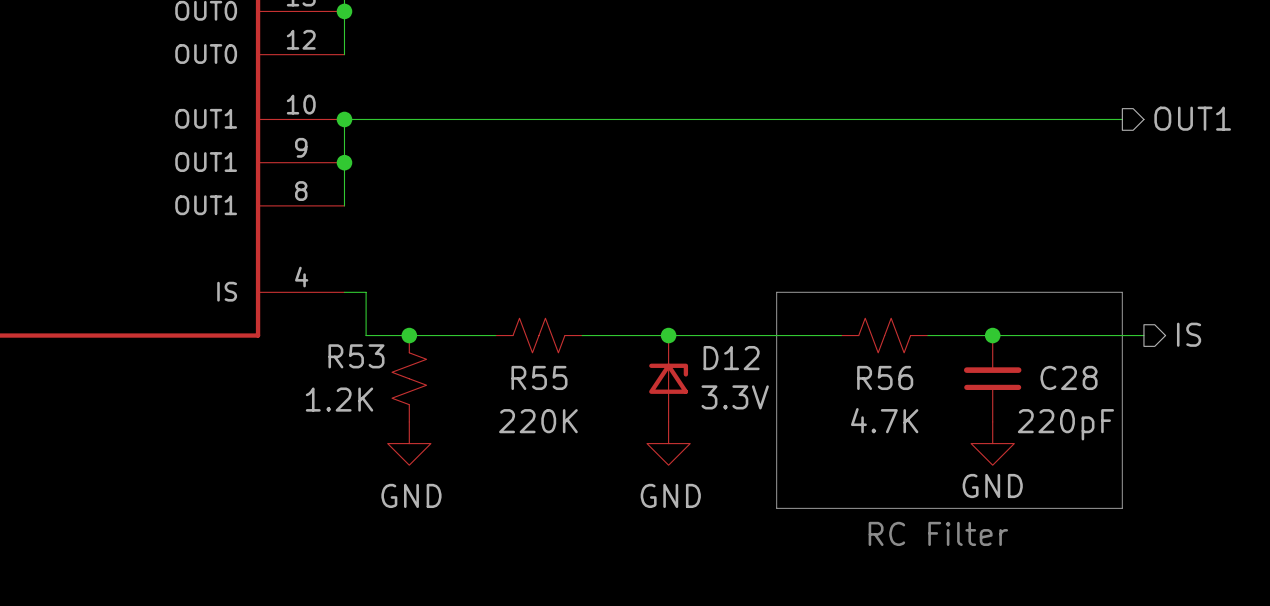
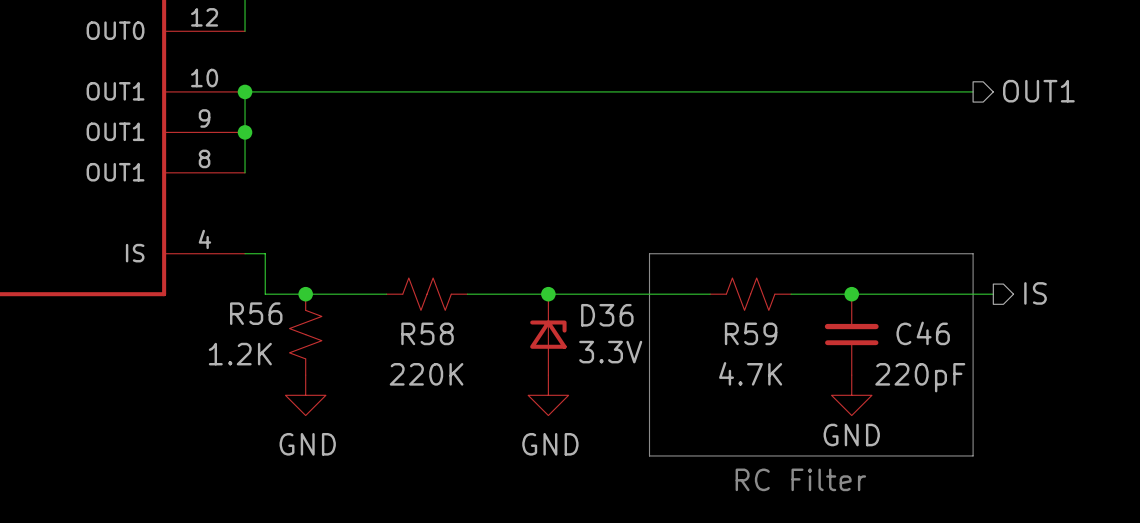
R53 name: R53 (356, 356) -> R56 (256, 313)
D12 name: D12 (731, 358) -> D36 (607, 315)
R55 name: R55 (539, 377) -> R58 (427, 333)
R56 name: R56 (885, 377) -> R59 (751, 333)
C28 name: C28 (1069, 377) -> C46 (923, 333)

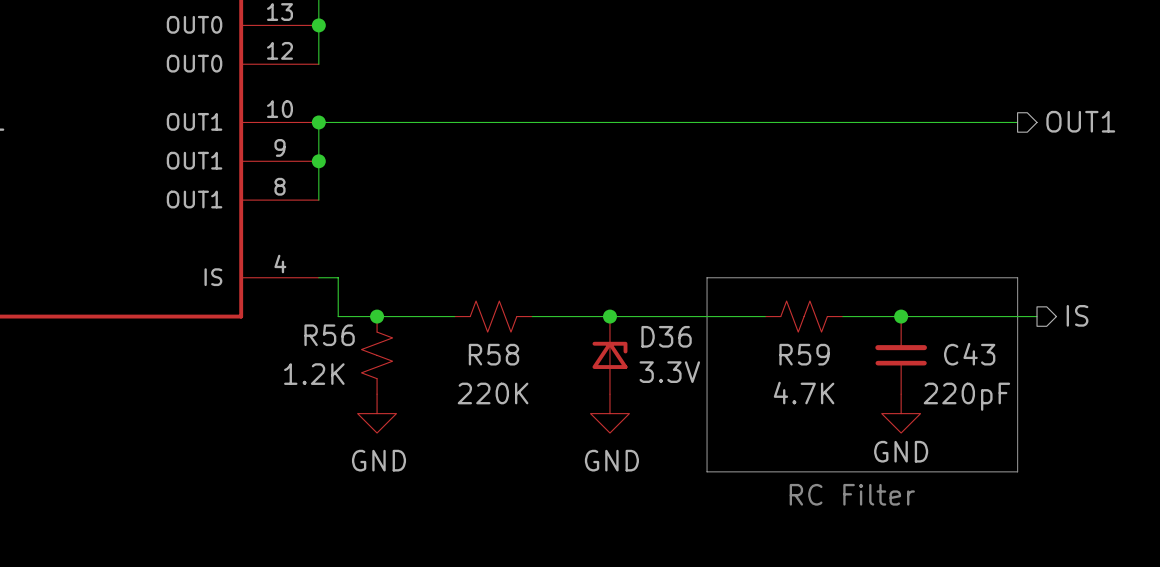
C46 name: C46 (923, 333) -> C43 (969, 354)

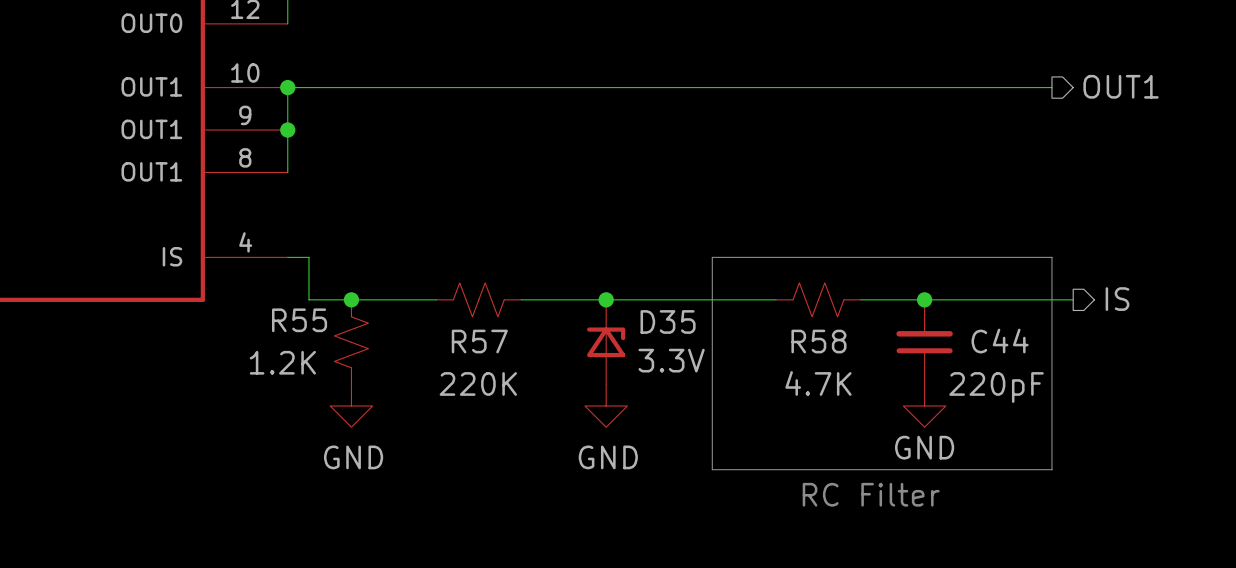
R56 name: R56 (329, 335) -> R55 (299, 320)
D36 name: D36 (666, 336) -> D35 (668, 321)
R58 name: R58 (493, 354) -> R57 (479, 341)
R59 name: R59 (804, 354) -> R58 (818, 341)
C43 name: C43 (969, 354) -> C44 (1000, 341)

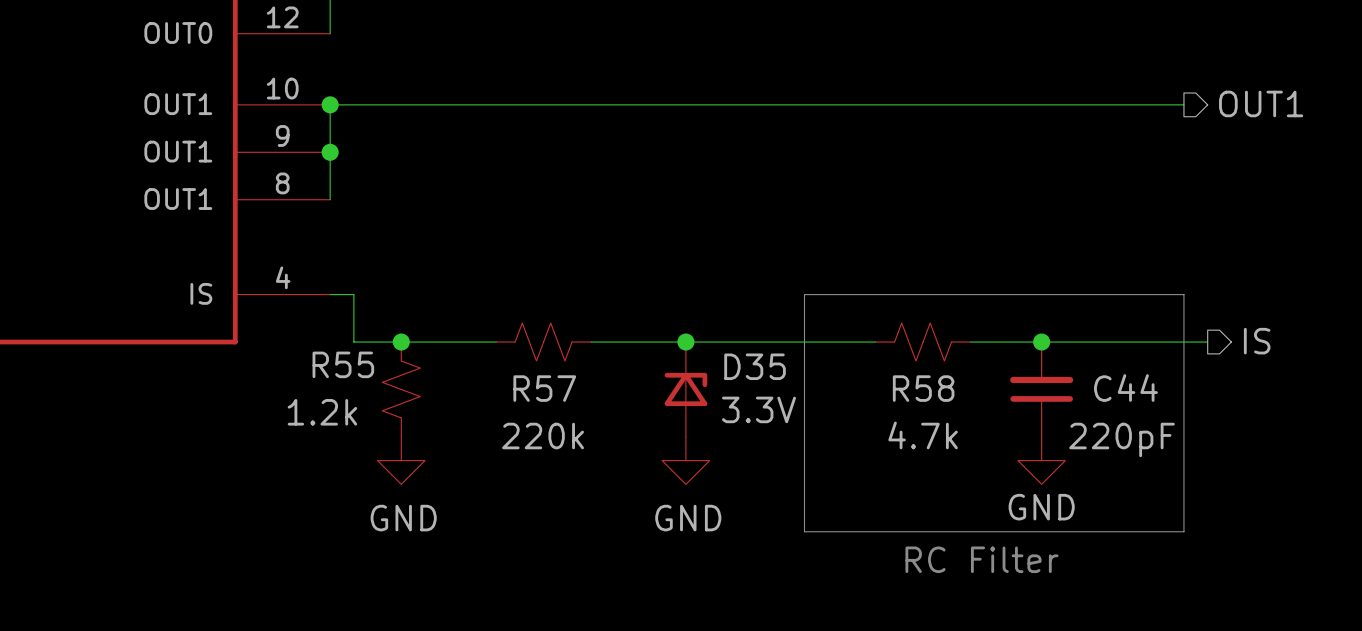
R55 value: 1.2K (282, 362) -> 1.2k (322, 412)
R57 value: 220K (478, 383) -> 220k (543, 436)
R58 value: 4.7K (818, 383) -> 4.7k (923, 435)

